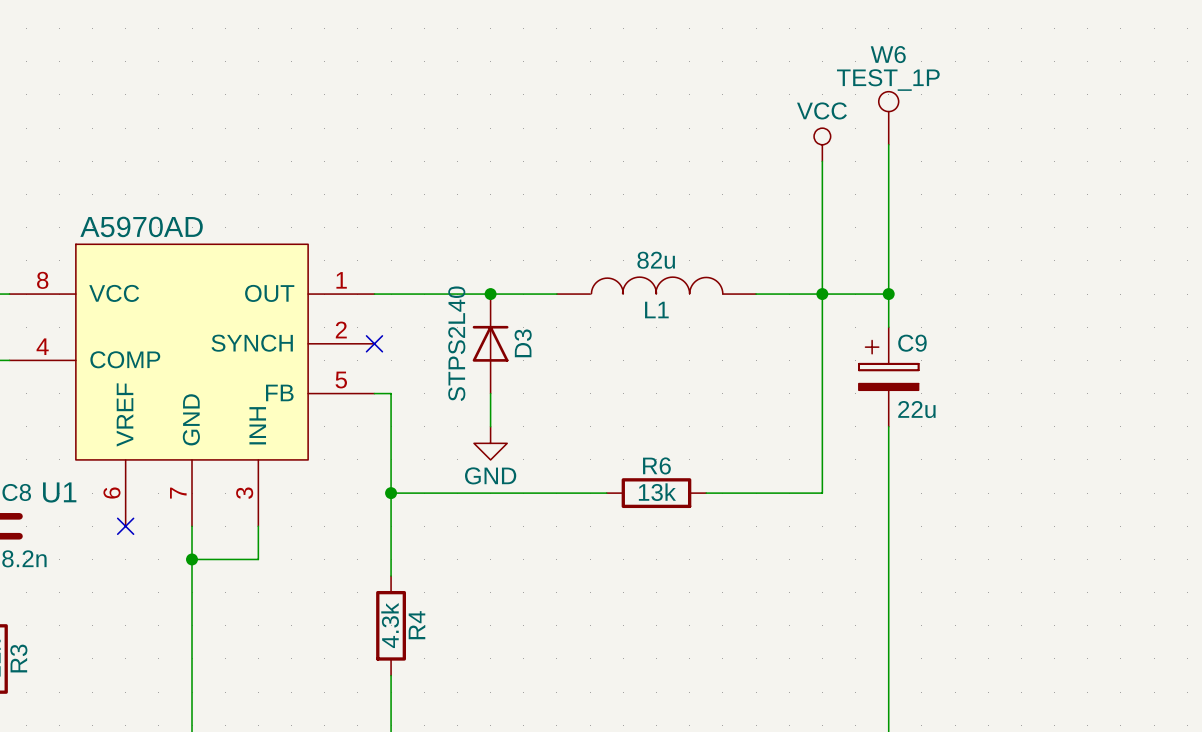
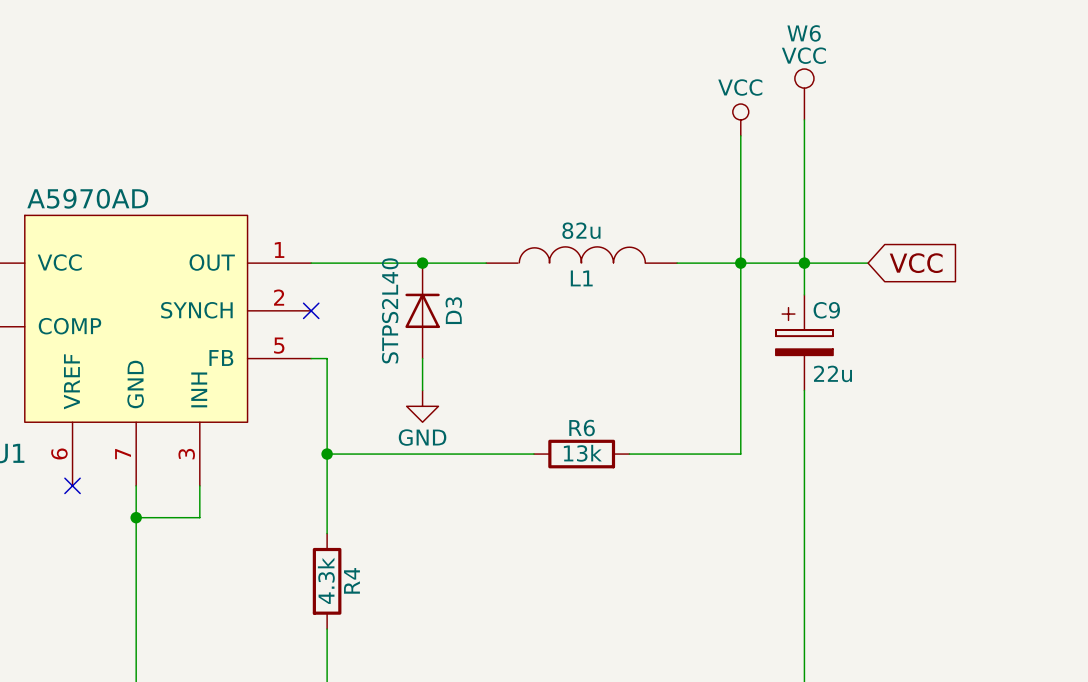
W6 value: TEST_1P (888, 80) -> VCC (803, 55)
wire: none -> (804, 263) (868, 263)
global label: none -> VCC (916, 263)

